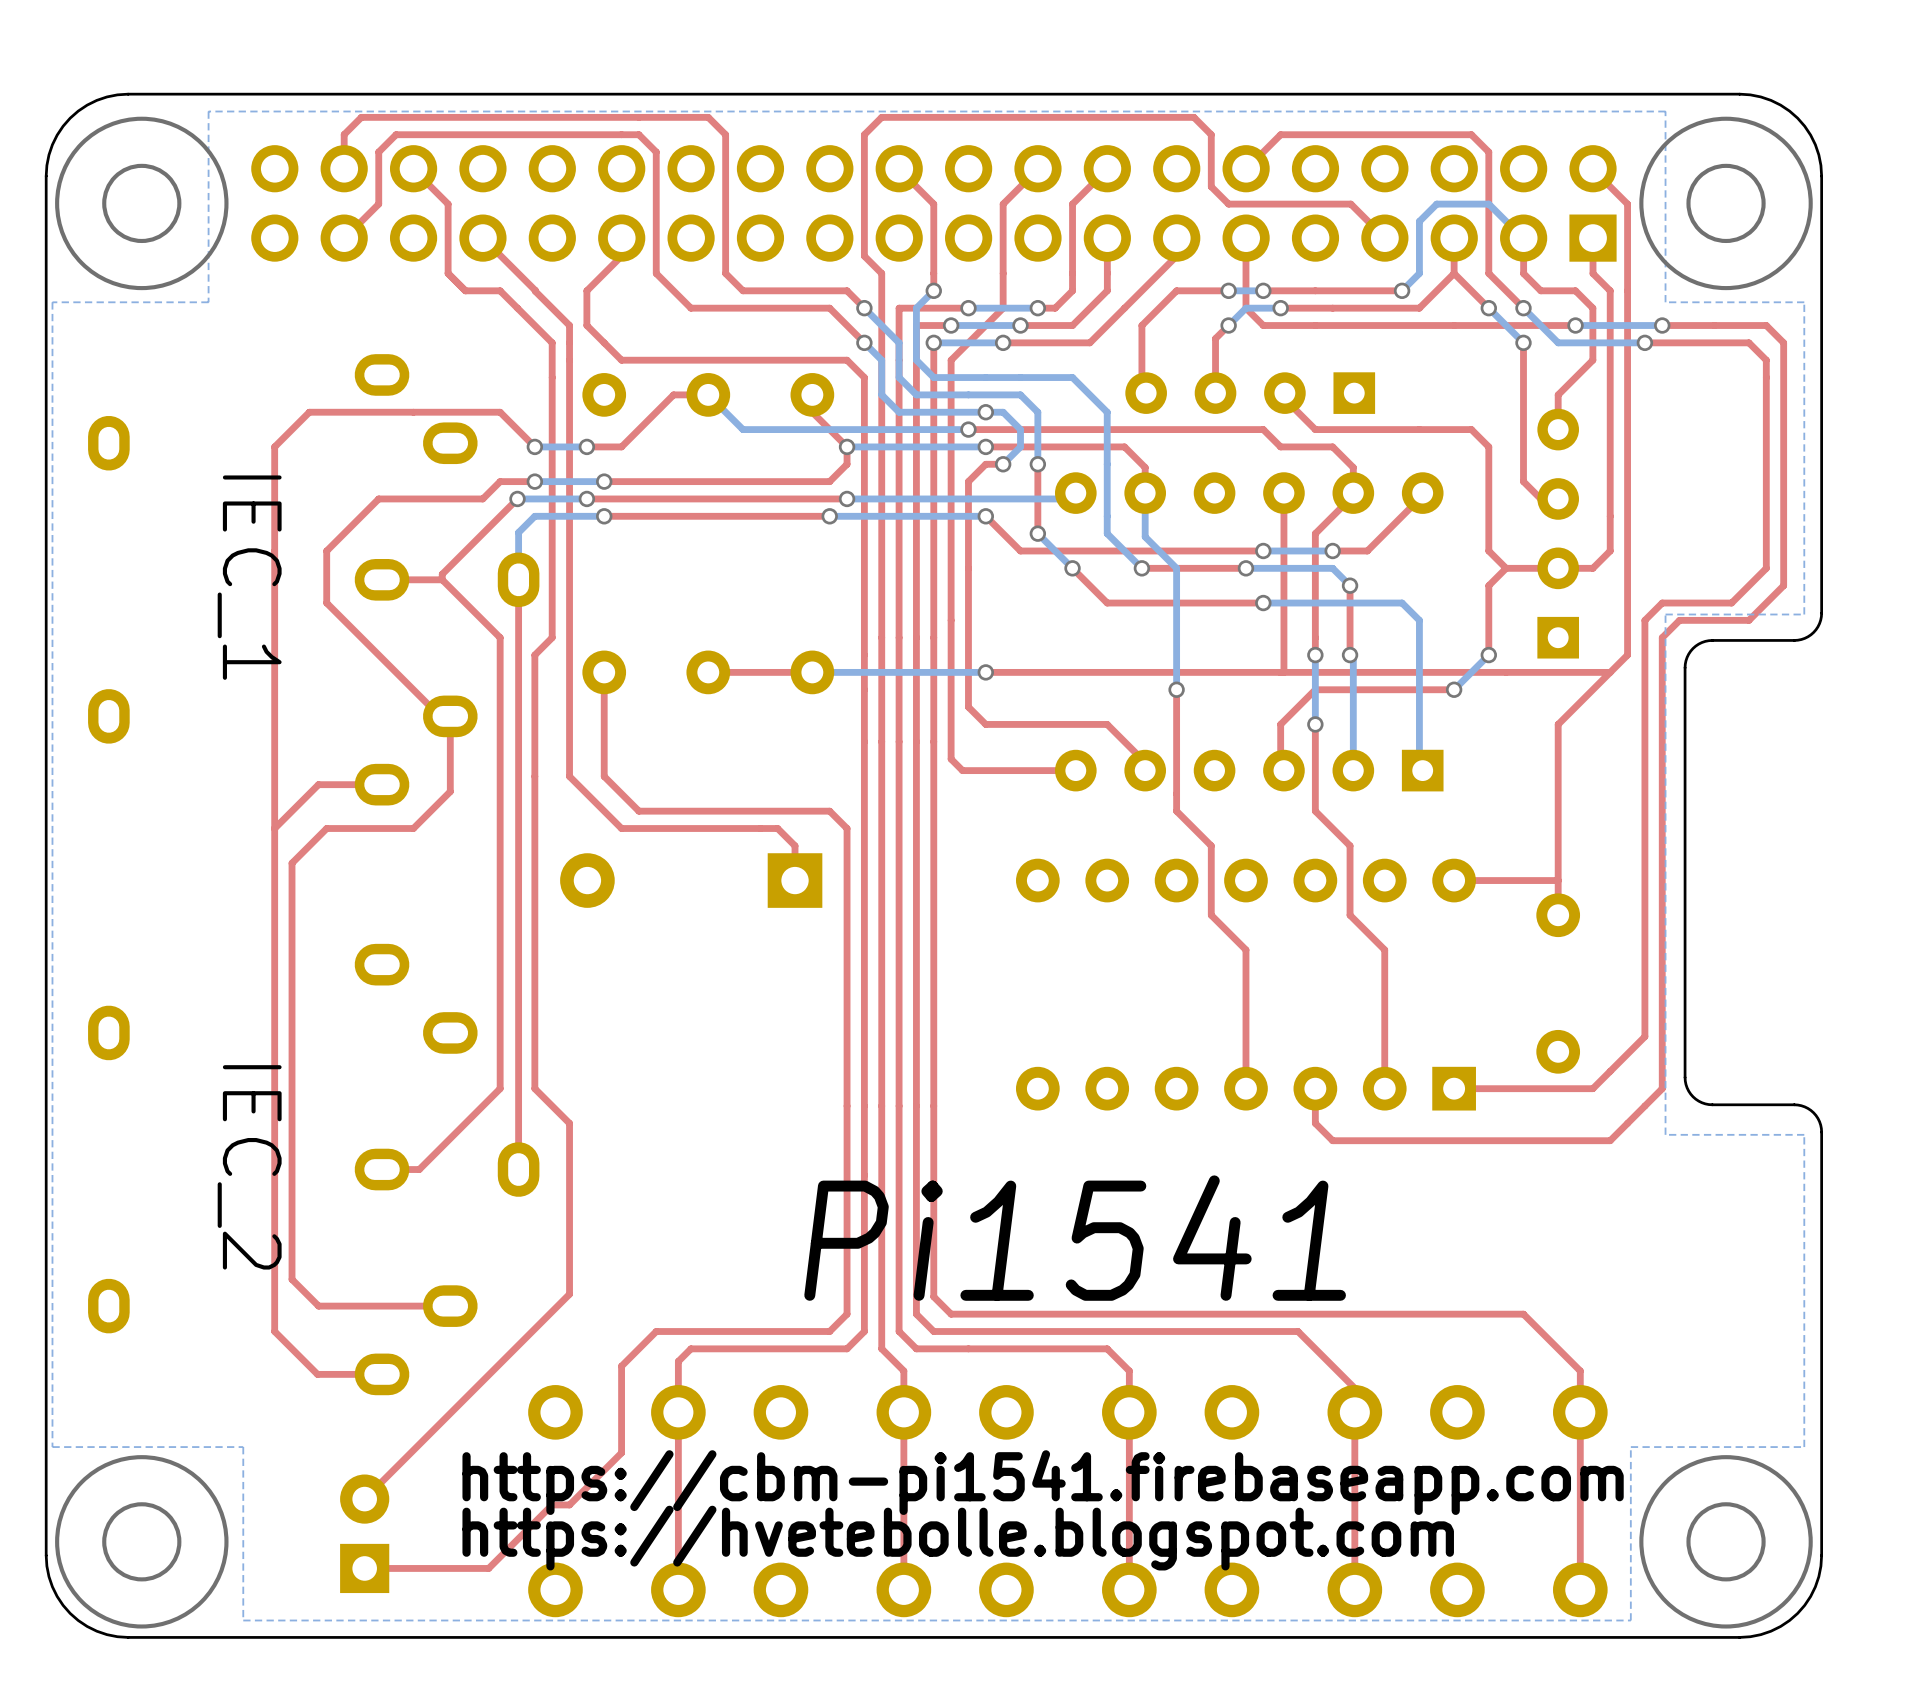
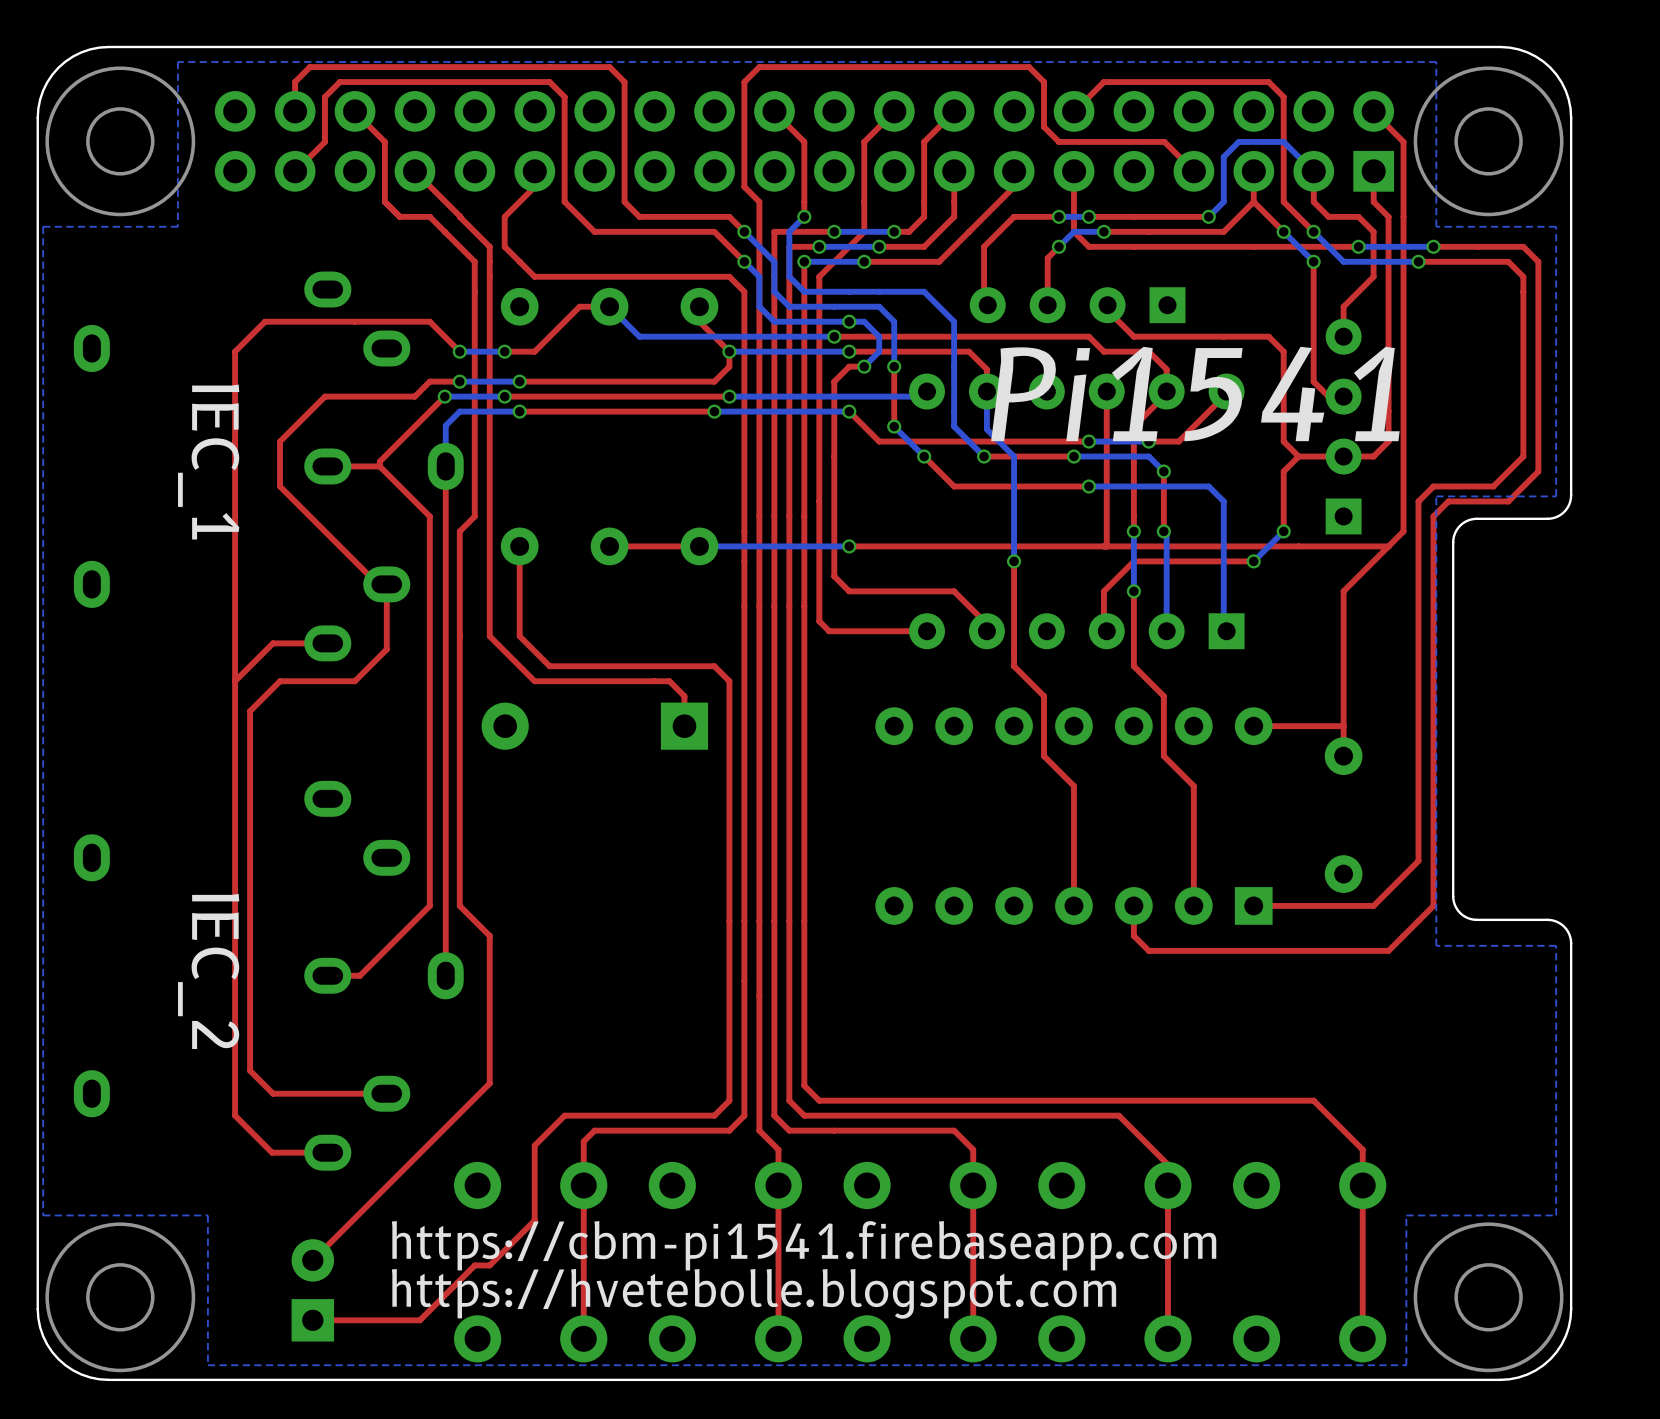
text: none -> Pi1541 (1195, 394)
text: Pi1541 (1075, 1238) -> none

